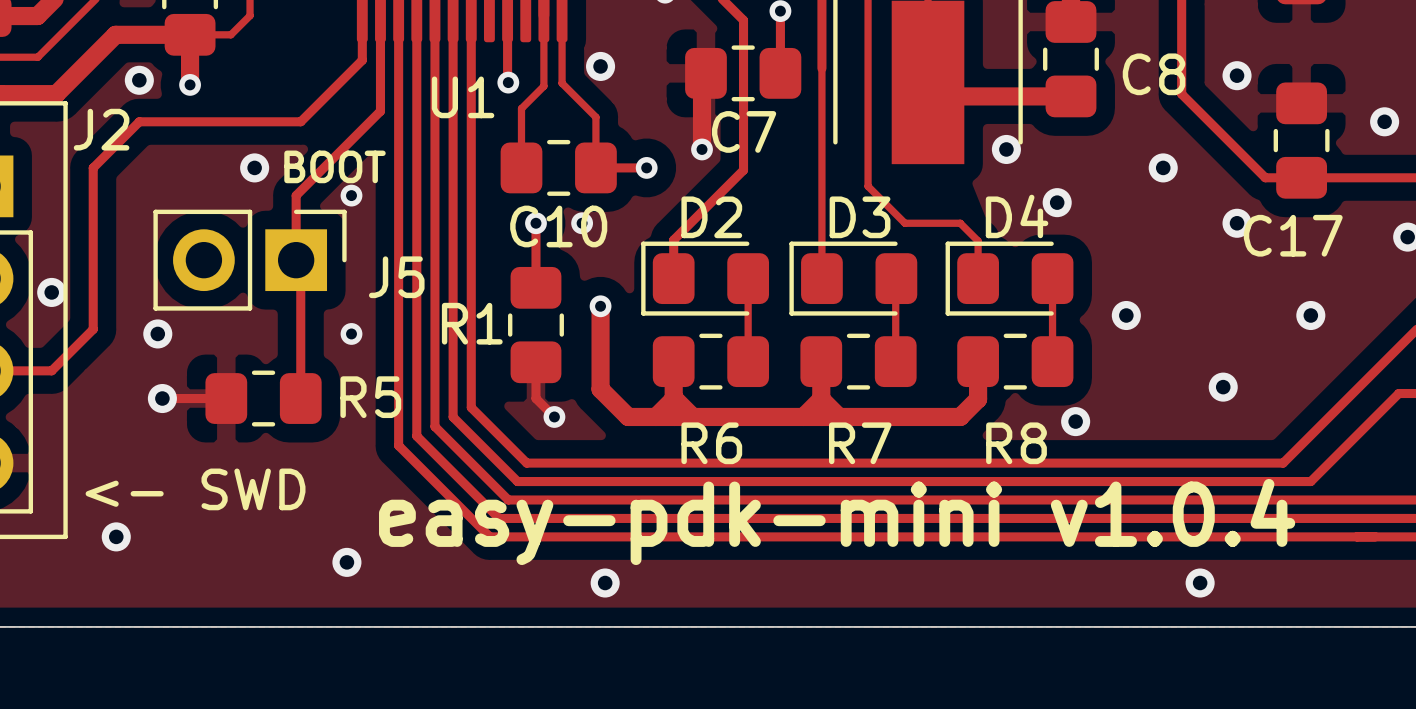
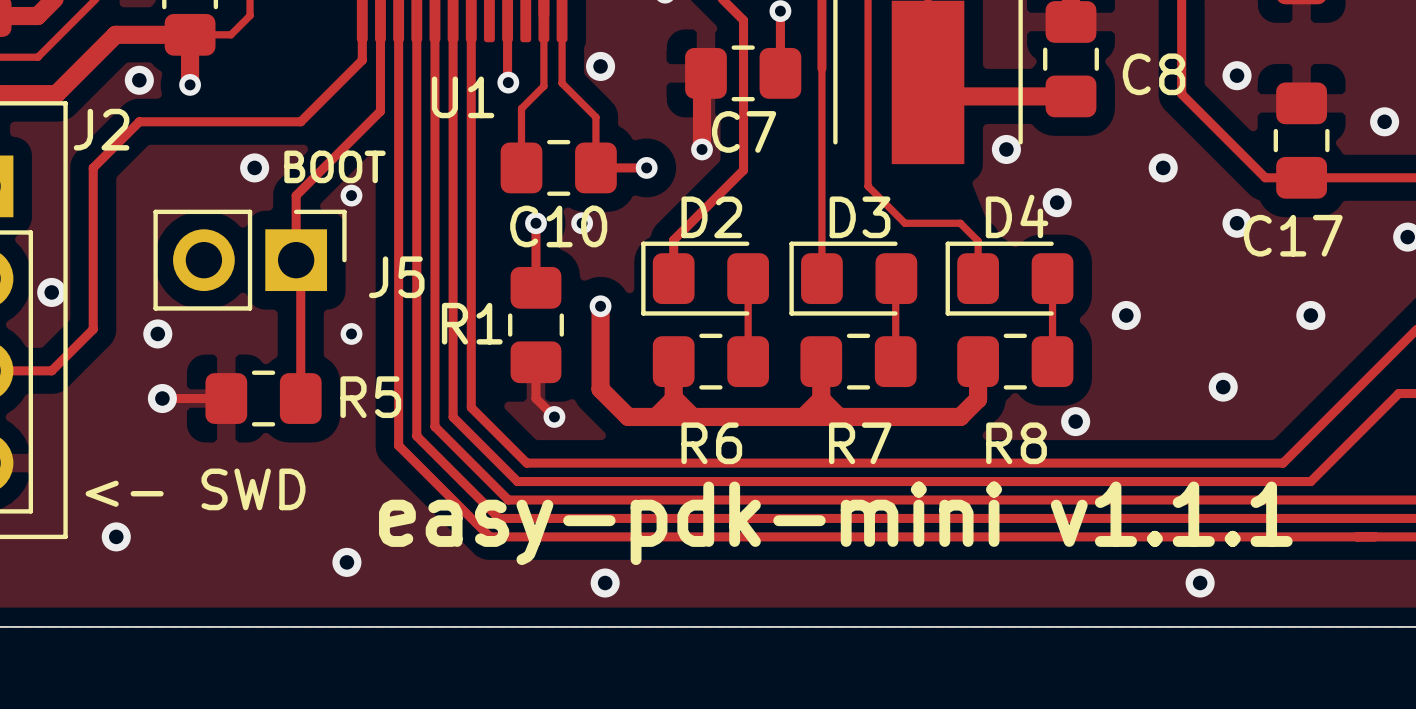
text: easy-pdk-mini v1.0.4 (837, 522) -> easy-pdk-mini v1.1.1 (835, 523)

